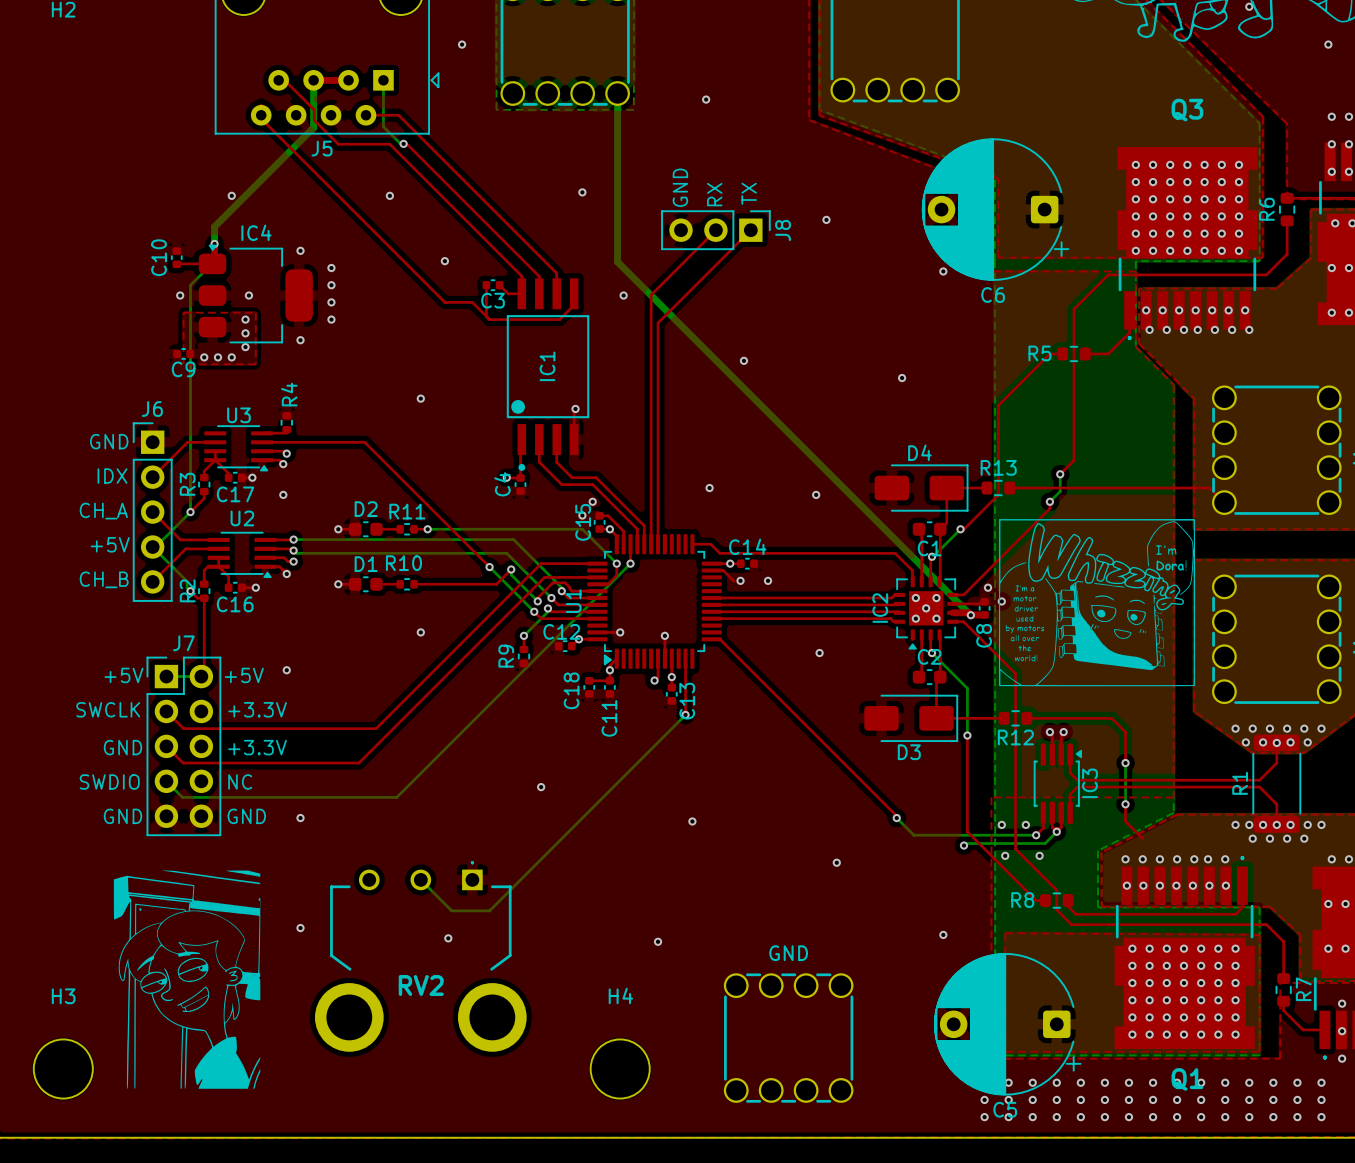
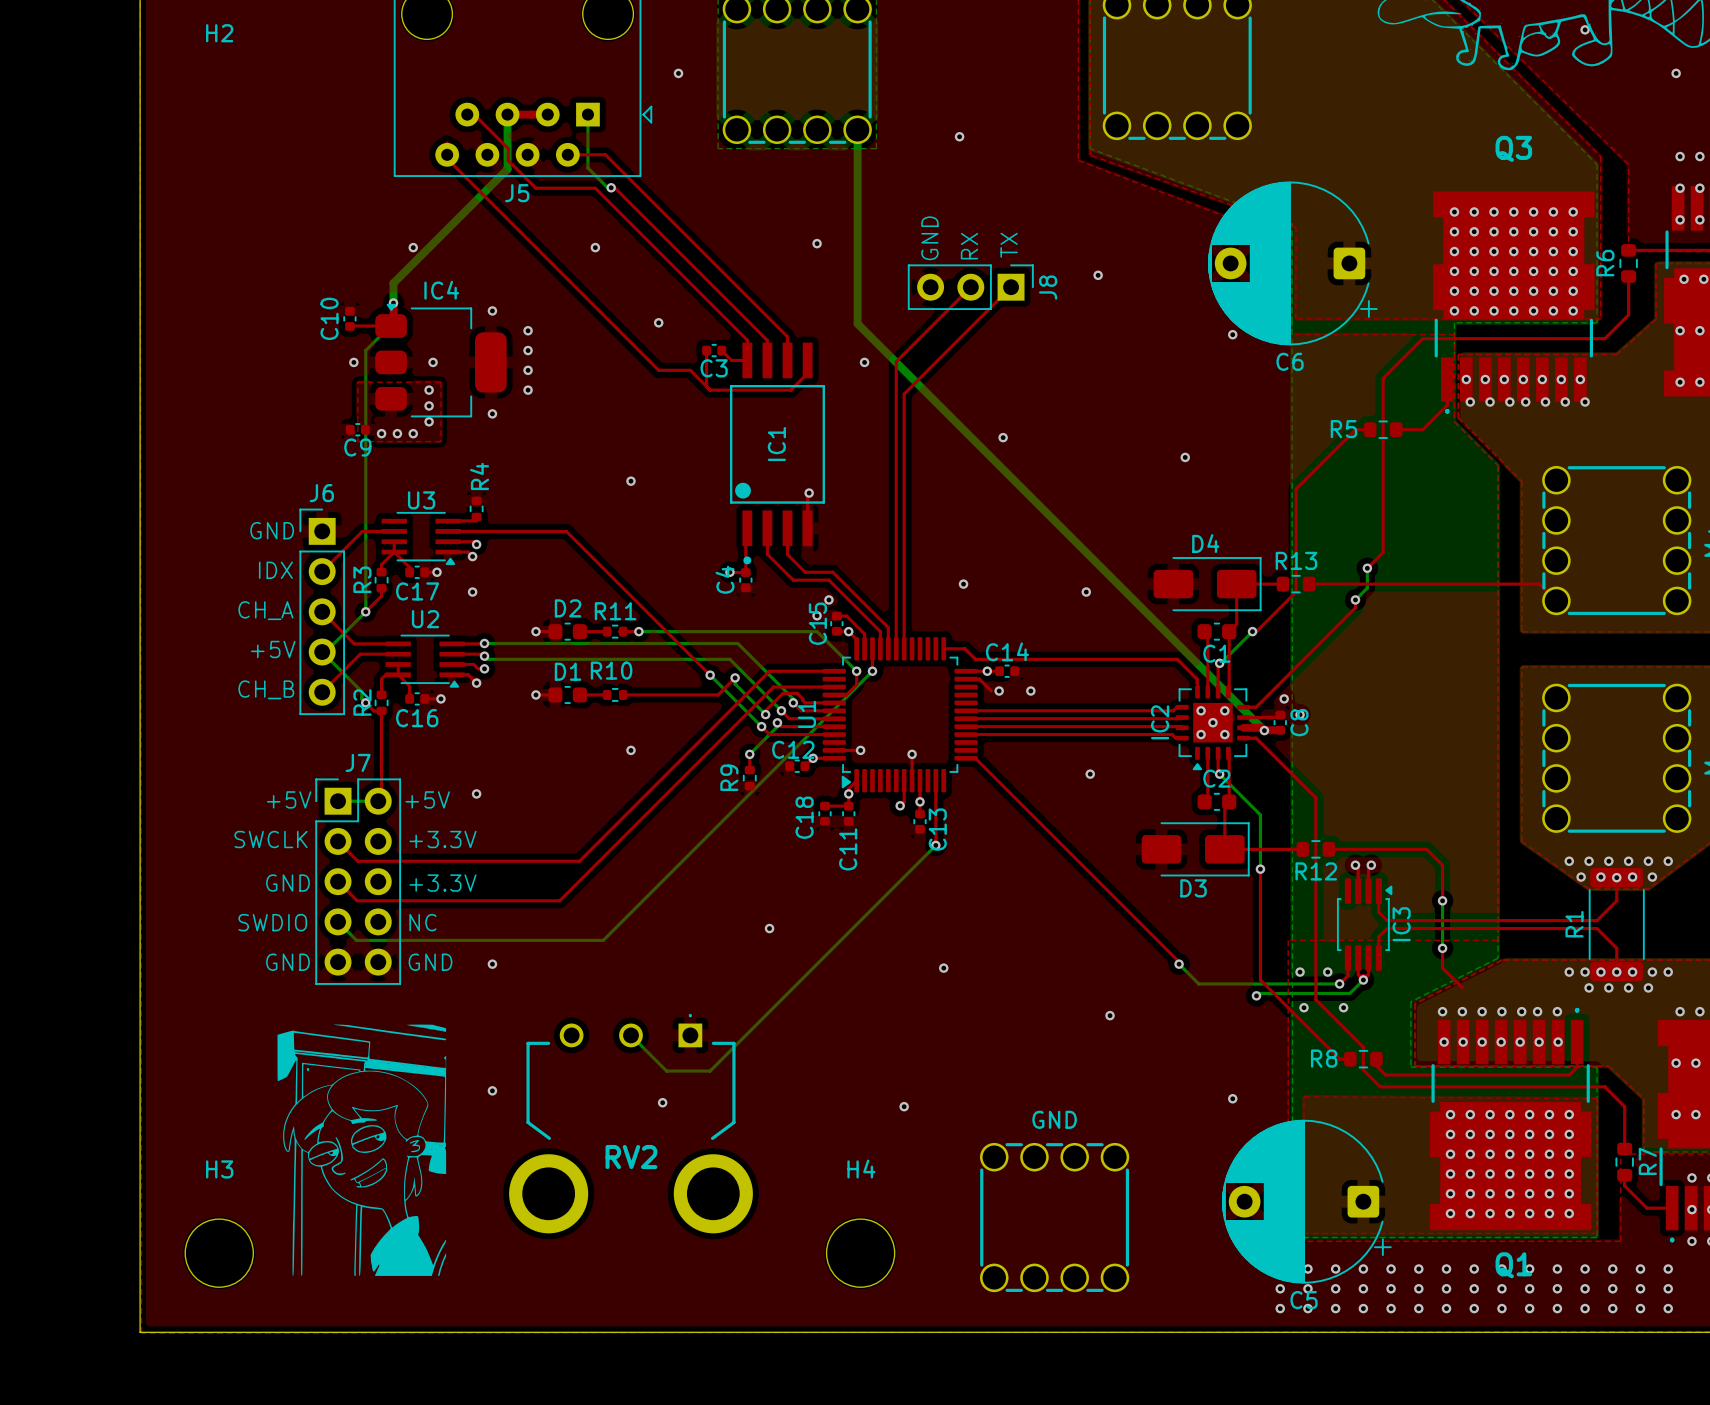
drawing: [999, 519, 1196, 687] -> none
C8 name position: C8 (984, 635) -> C8 (1299, 722)

